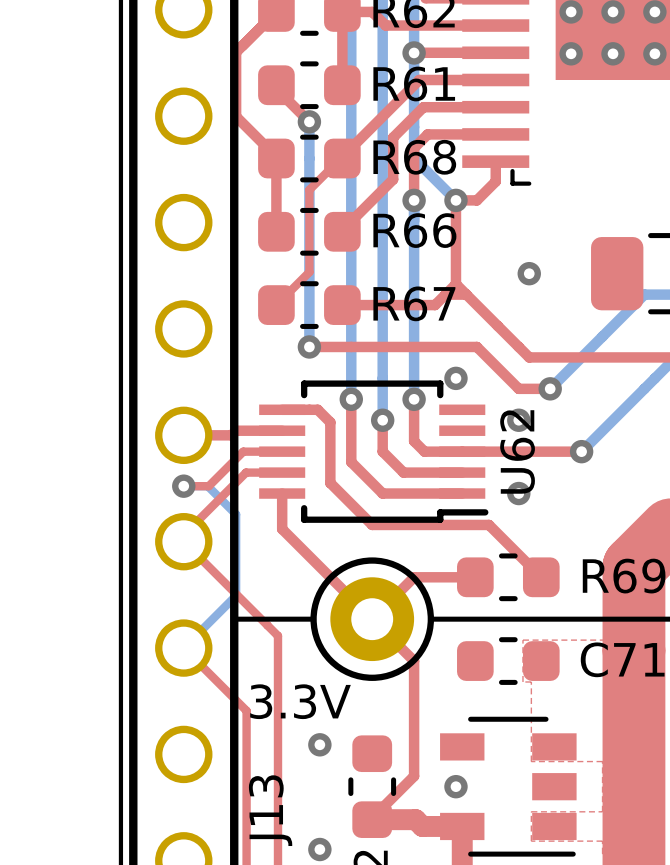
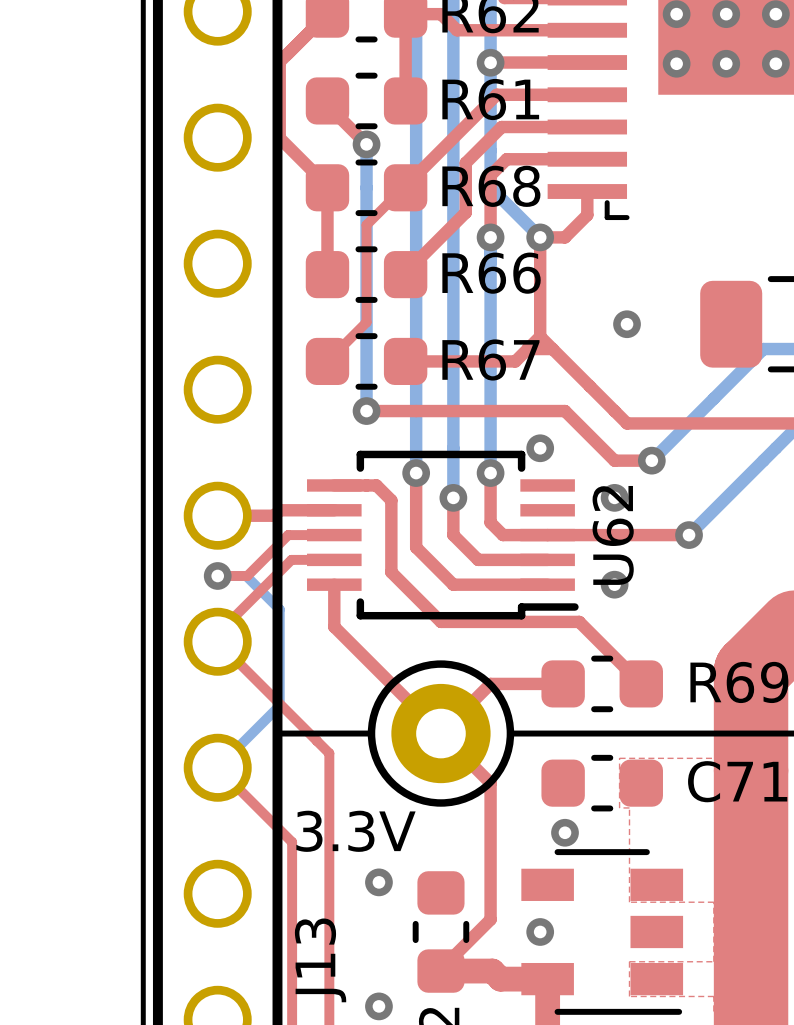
via: none -> (565, 832)

